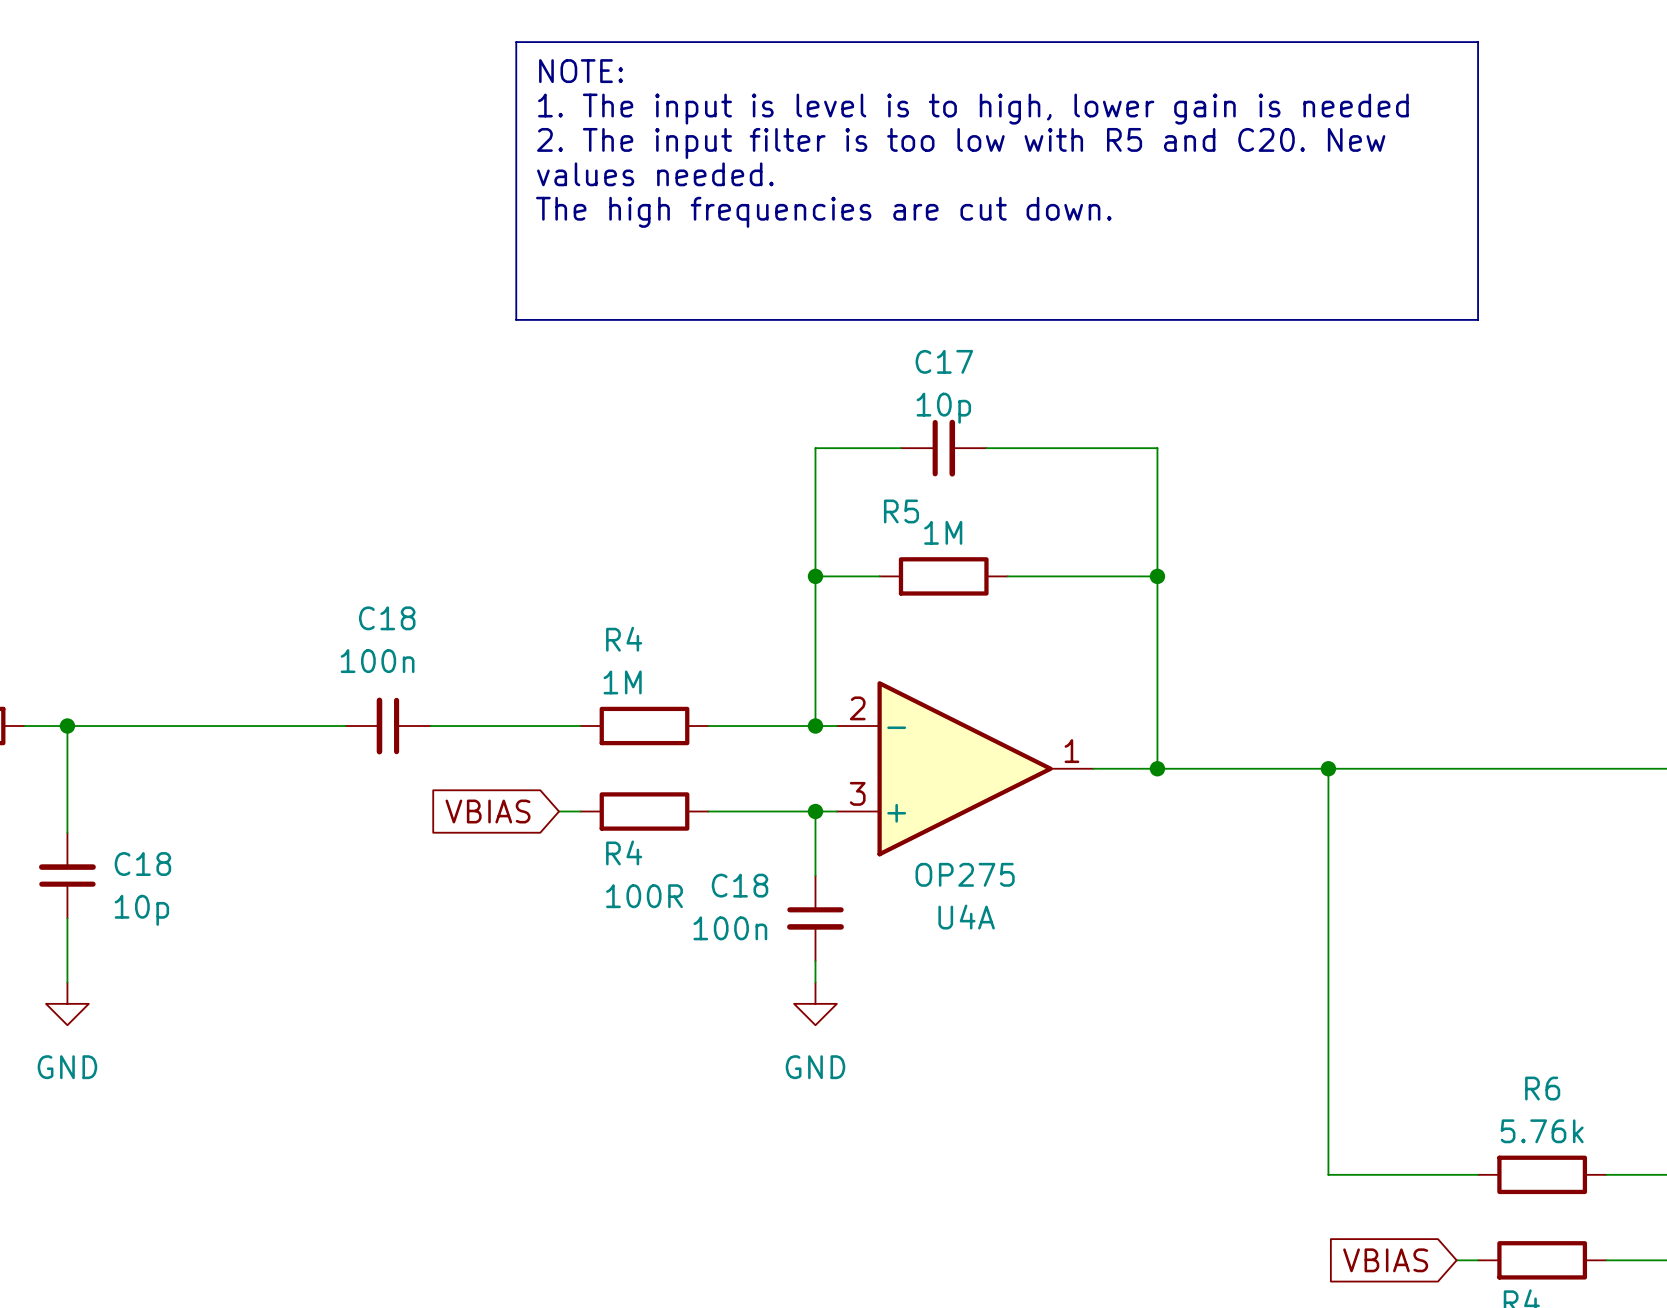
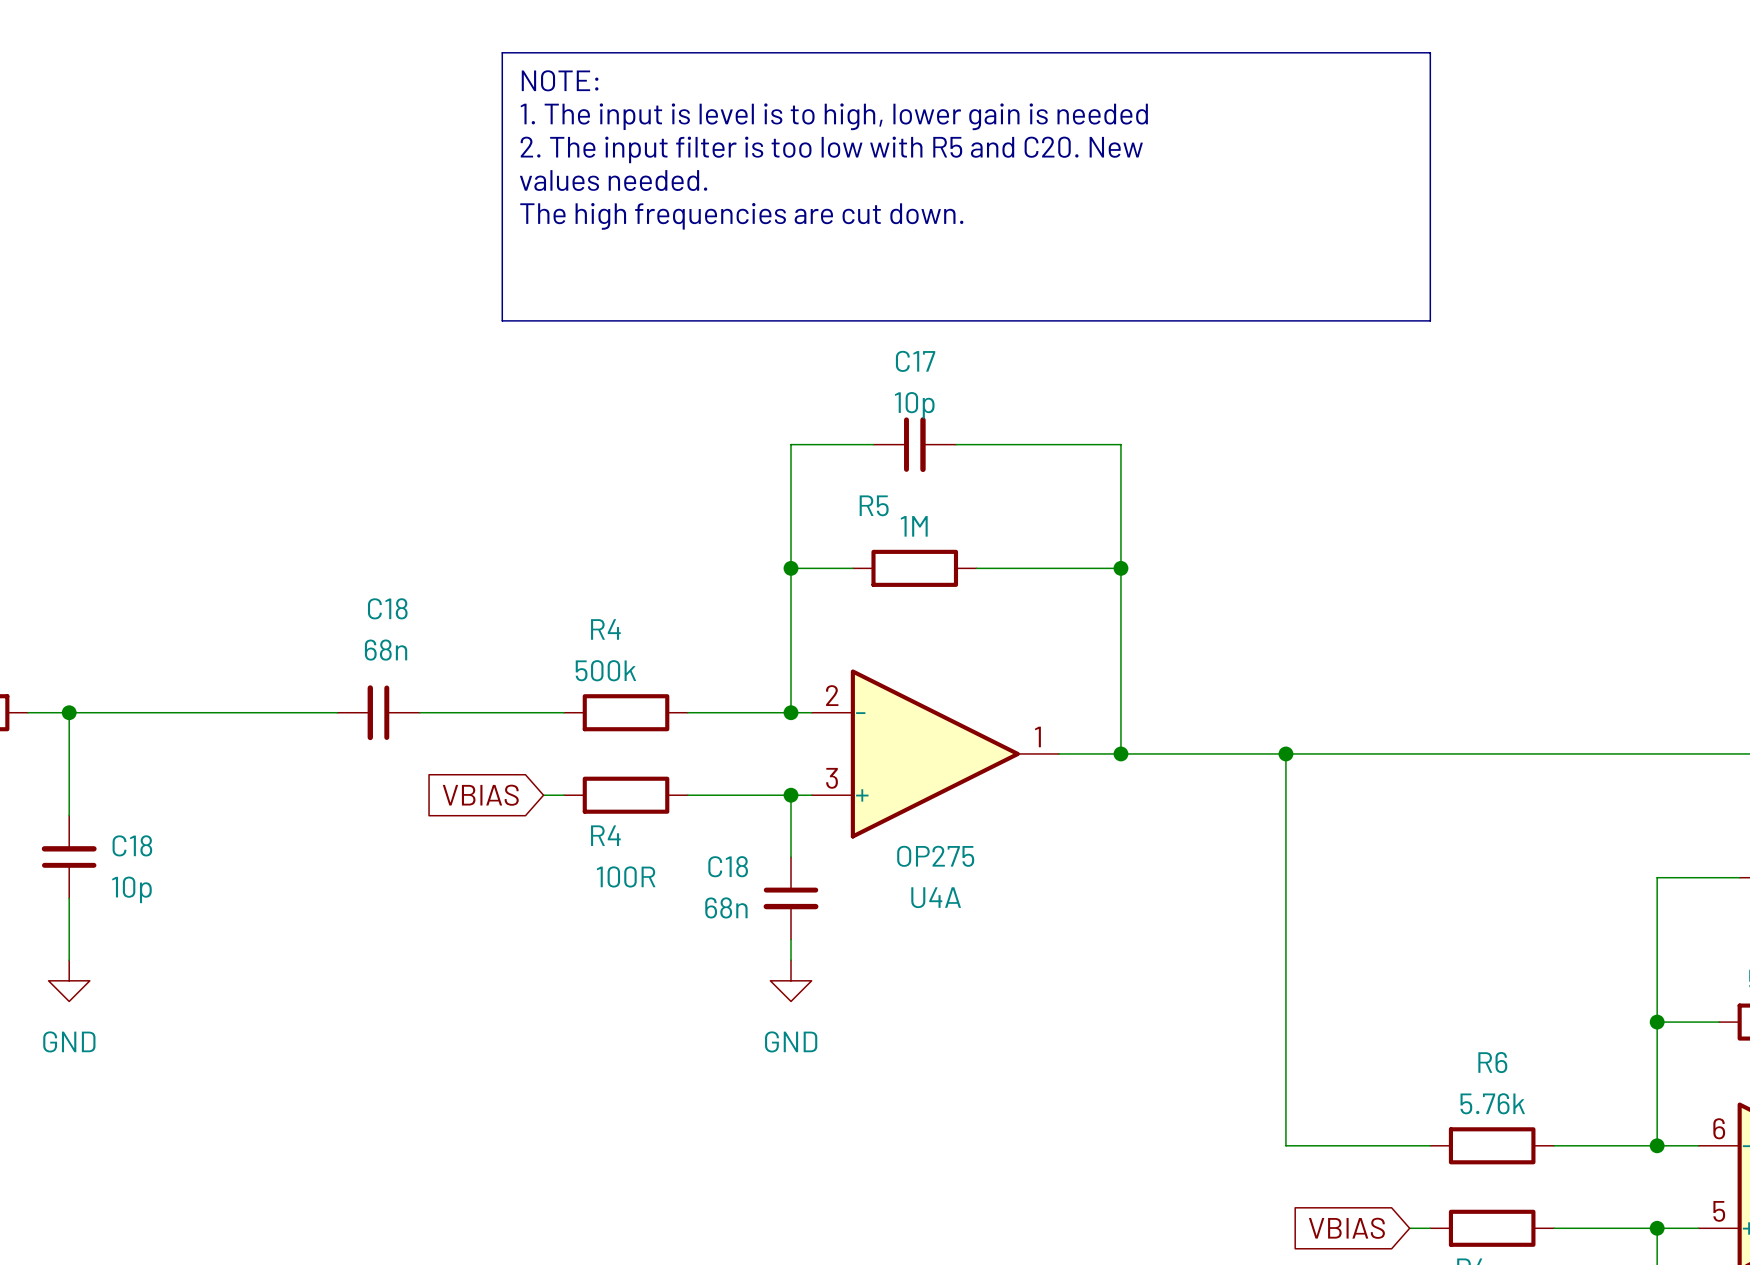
C18 value: 100n (377, 661) -> 68n (386, 650)
R4 value: 1M (622, 682) -> 500k (605, 670)
C18 value: 100n (730, 928) -> 68n (726, 907)

